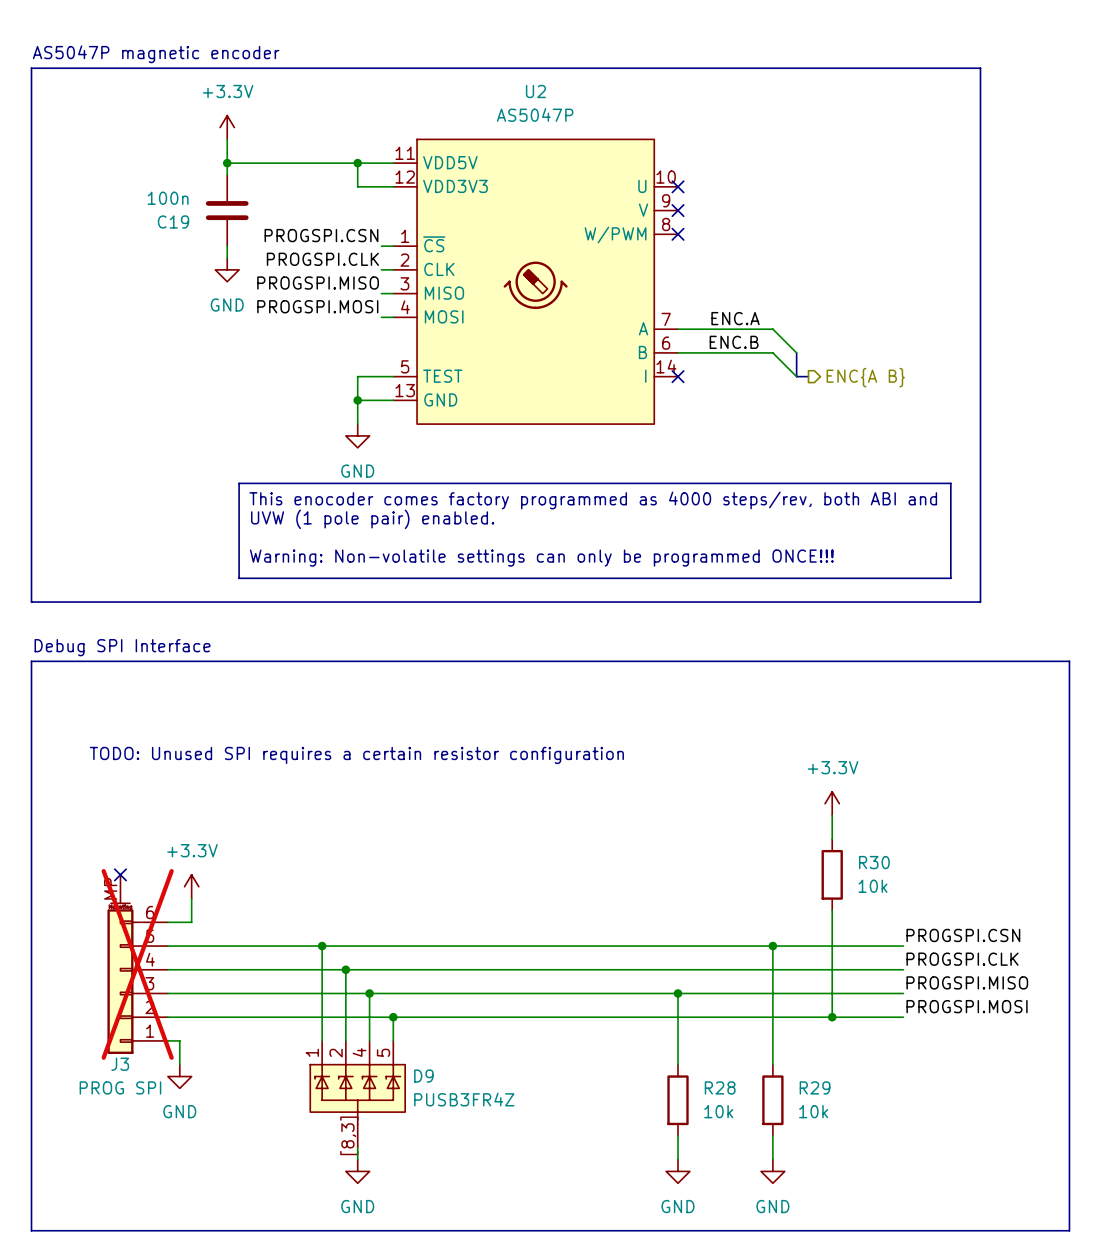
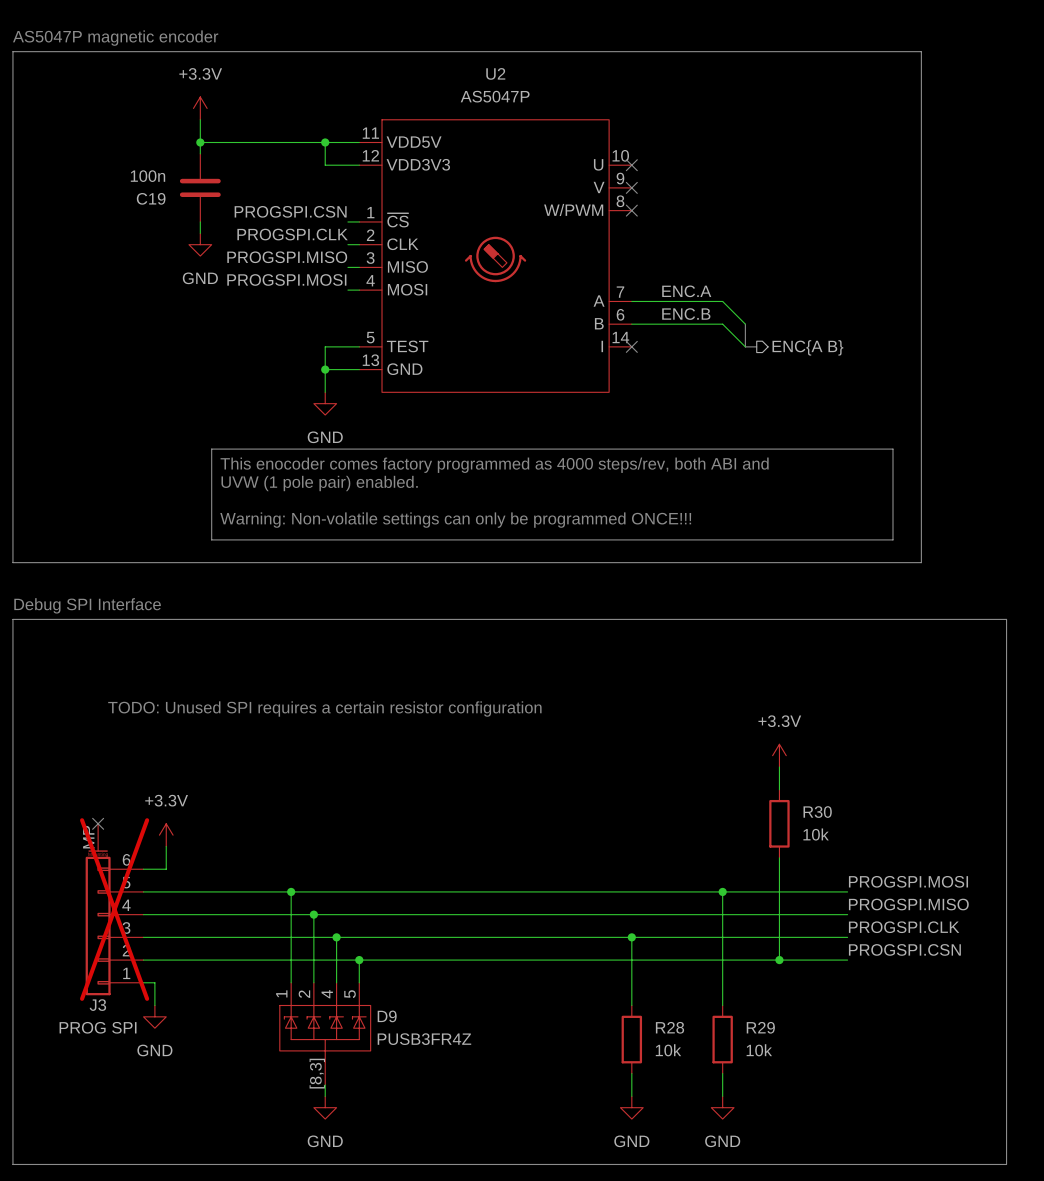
label: PROGSPI.CSN (963, 935) -> PROGSPI.MOSI (908, 881)
label: PROGSPI.CLK (962, 959) -> PROGSPI.MISO (908, 904)
label: PROGSPI.MISO (967, 982) -> PROGSPI.CLK (904, 927)
label: PROGSPI.MOSI (967, 1006) -> PROGSPI.CSN (904, 949)

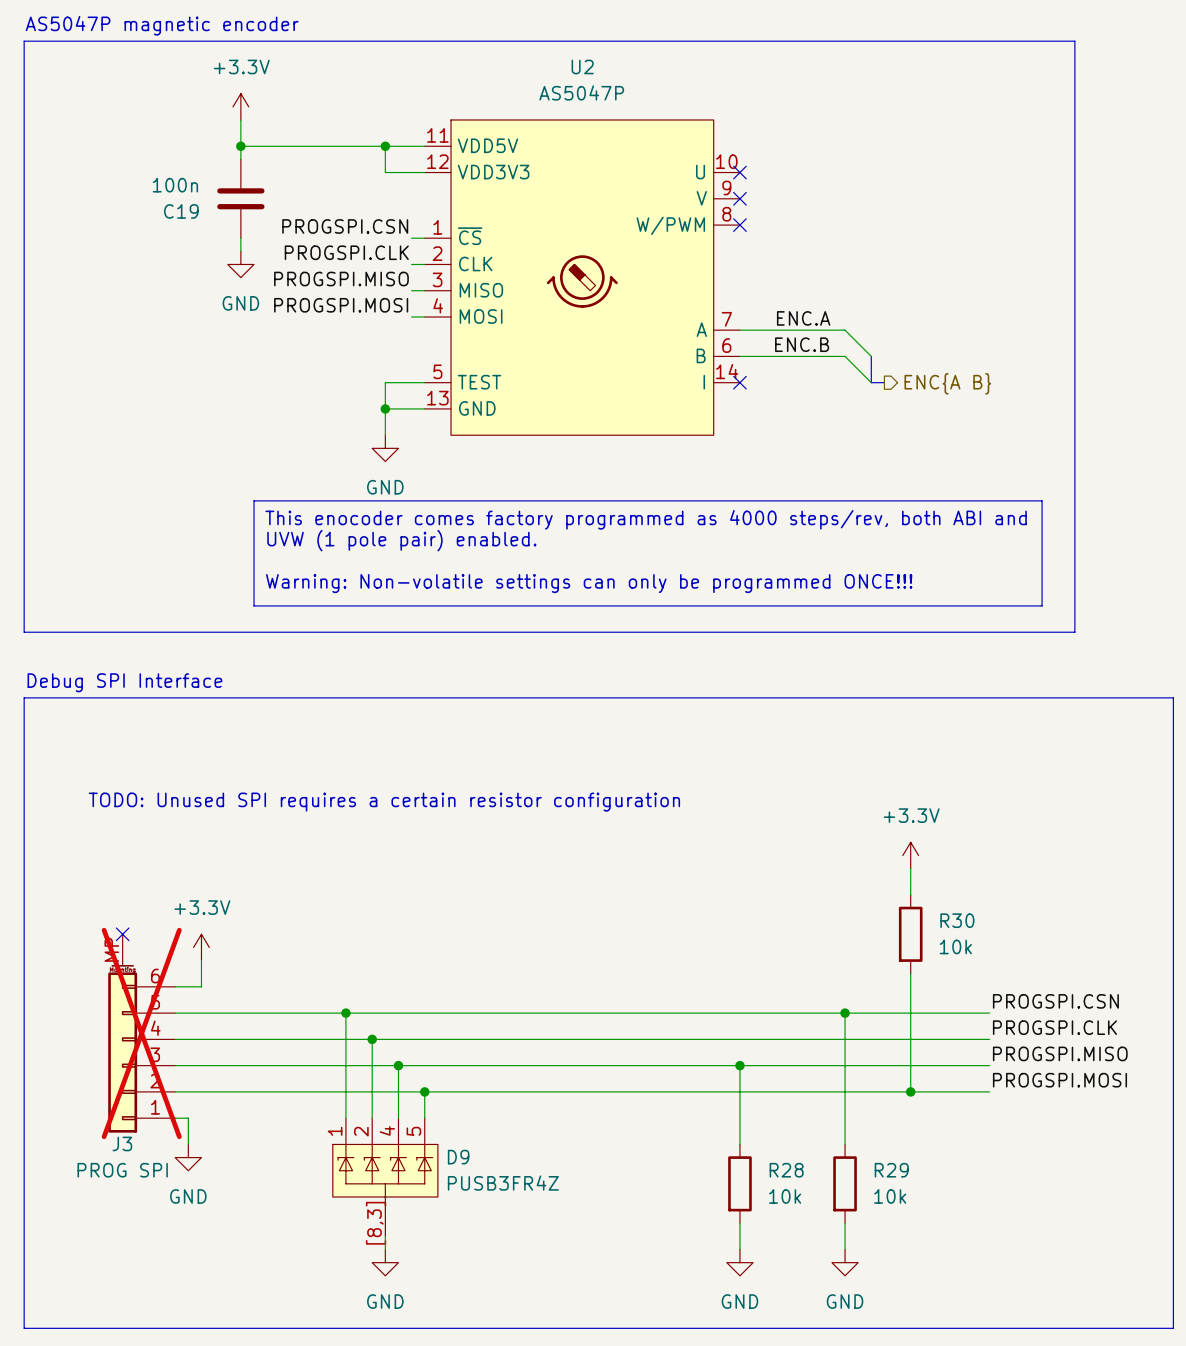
label: PROGSPI.MOSI (908, 881) -> PROGSPI.CSN (1055, 1001)
label: PROGSPI.MISO (908, 904) -> PROGSPI.CLK (1054, 1027)
label: PROGSPI.CLK (904, 927) -> PROGSPI.MISO (1060, 1053)
label: PROGSPI.CSN (904, 949) -> PROGSPI.MOSI (1059, 1080)

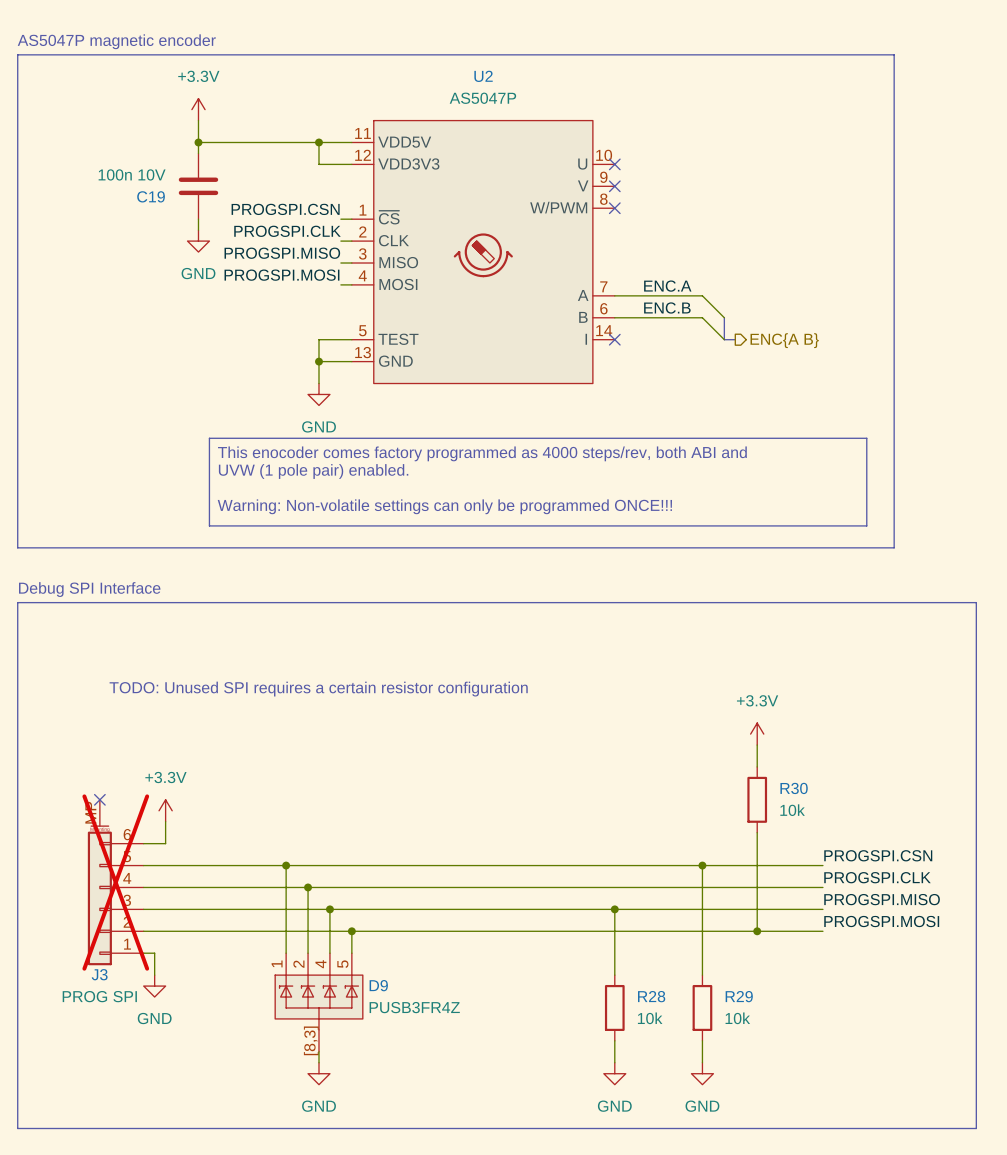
C19 value: 100n (175, 185) -> 100n 10V (132, 174)

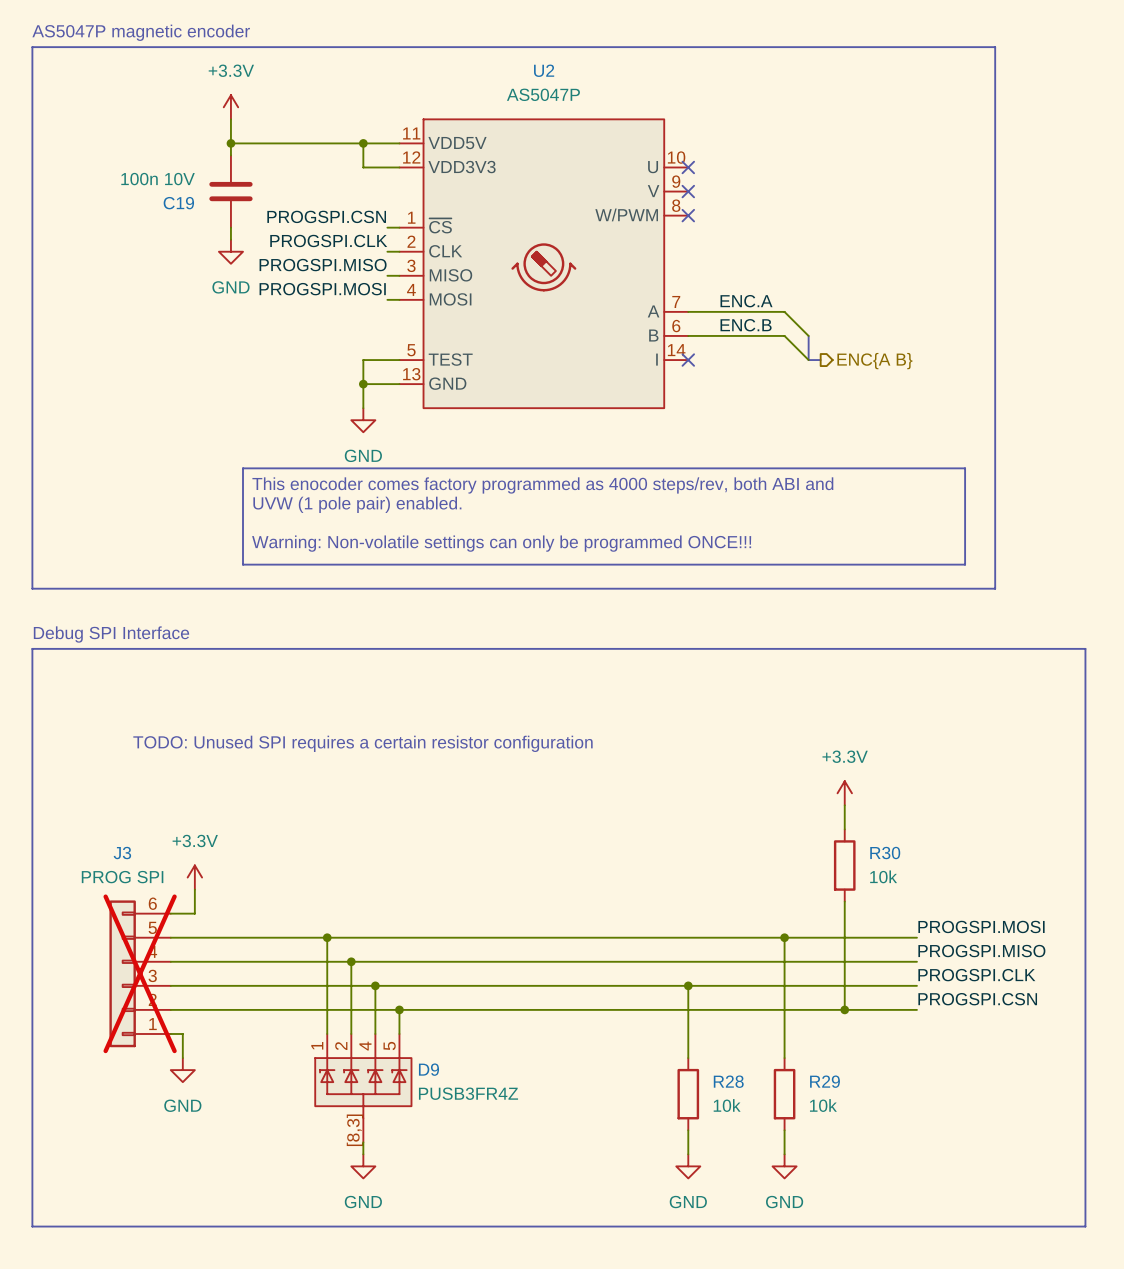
J3 symbol: [87, 799, 144, 966] -> [109, 900, 171, 1048]
no-connect mark: (99, 799) -> none
label: PROGSPI.CSN (878, 855) -> PROGSPI.MOSI (981, 926)
label: PROGSPI.CLK (877, 877) -> PROGSPI.MISO (981, 951)
label: PROGSPI.MISO (882, 899) -> PROGSPI.CLK (976, 975)
label: PROGSPI.MOSI (881, 921) -> PROGSPI.CSN (977, 999)
J3 name position: J3 (99, 974) -> J3 (122, 853)
J3 value position: PROG SPI (99, 996) -> PROG SPI (122, 877)

